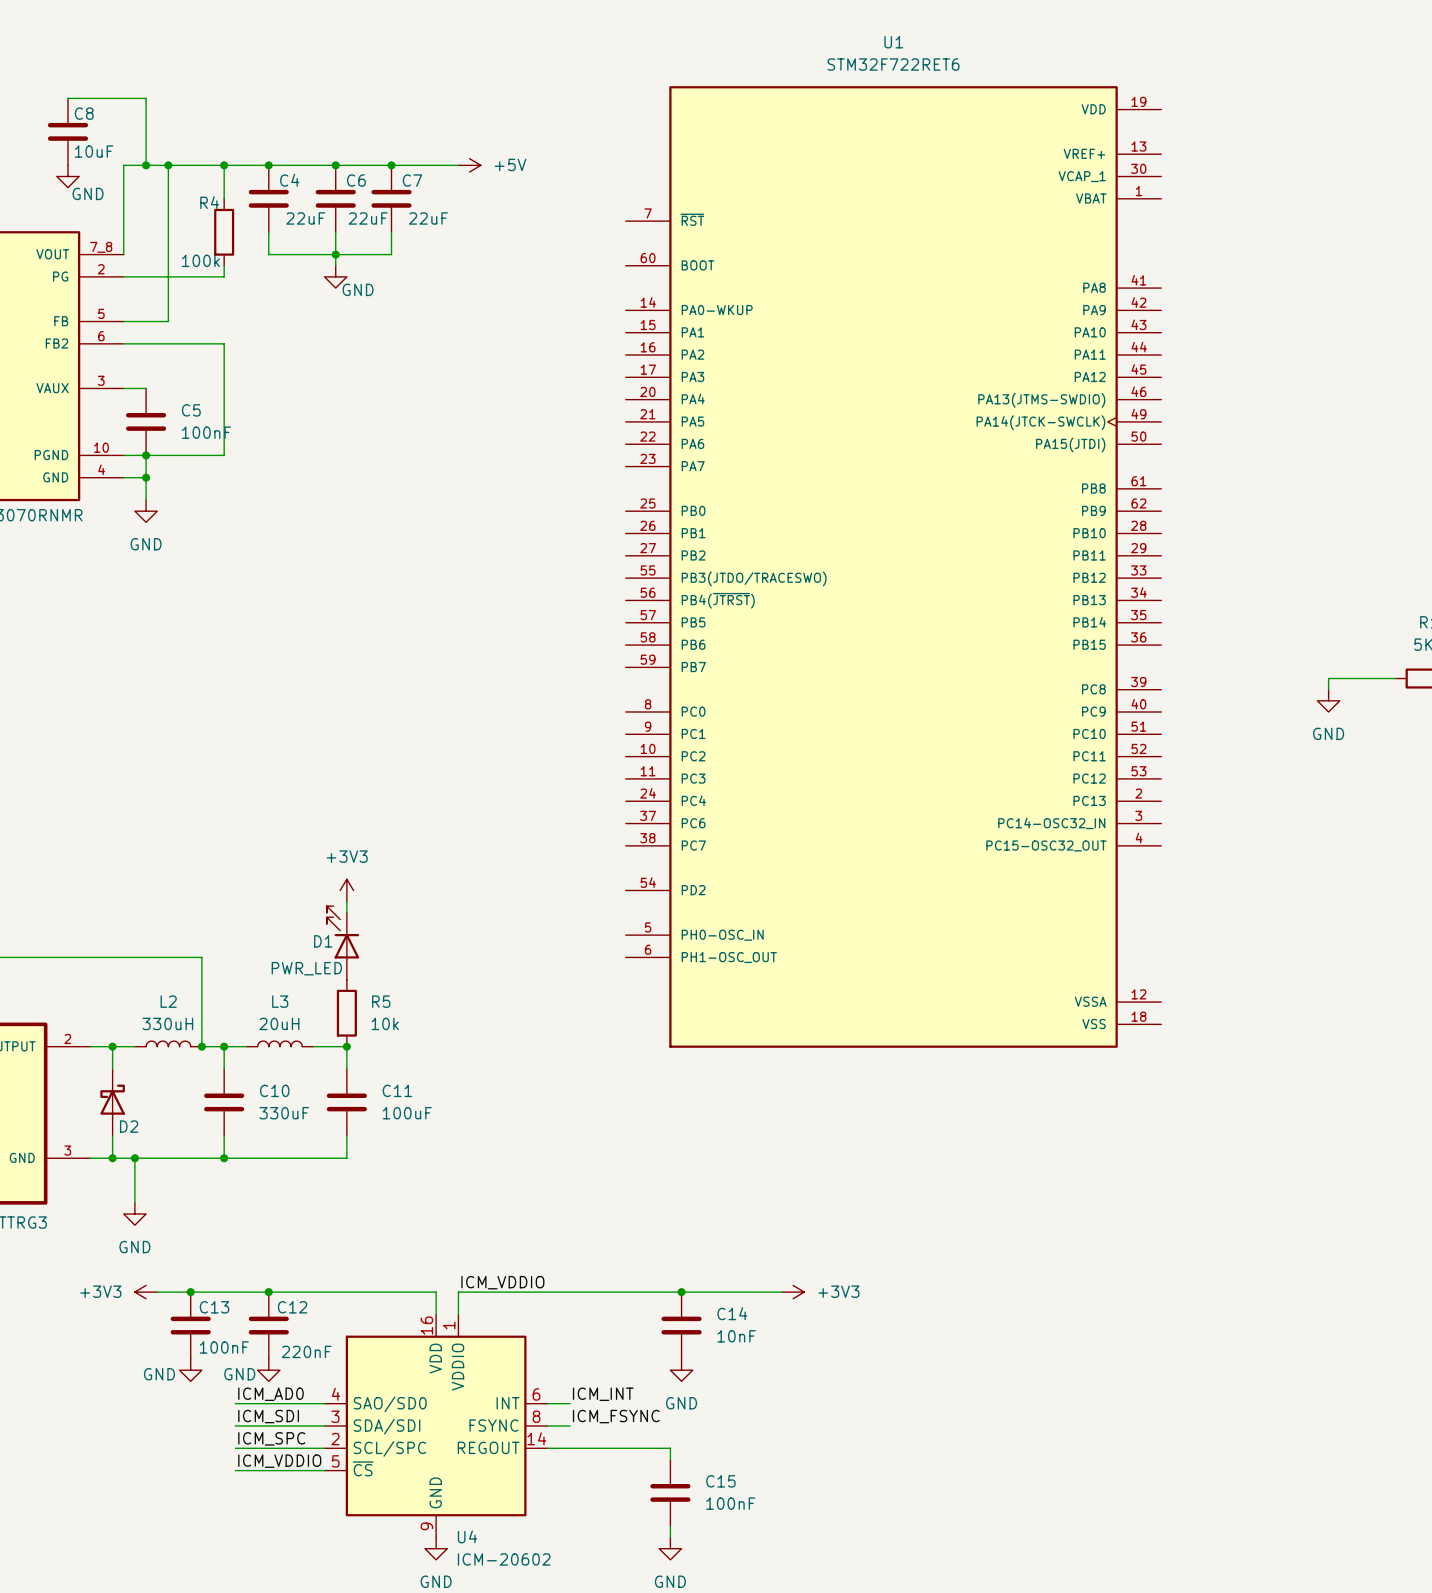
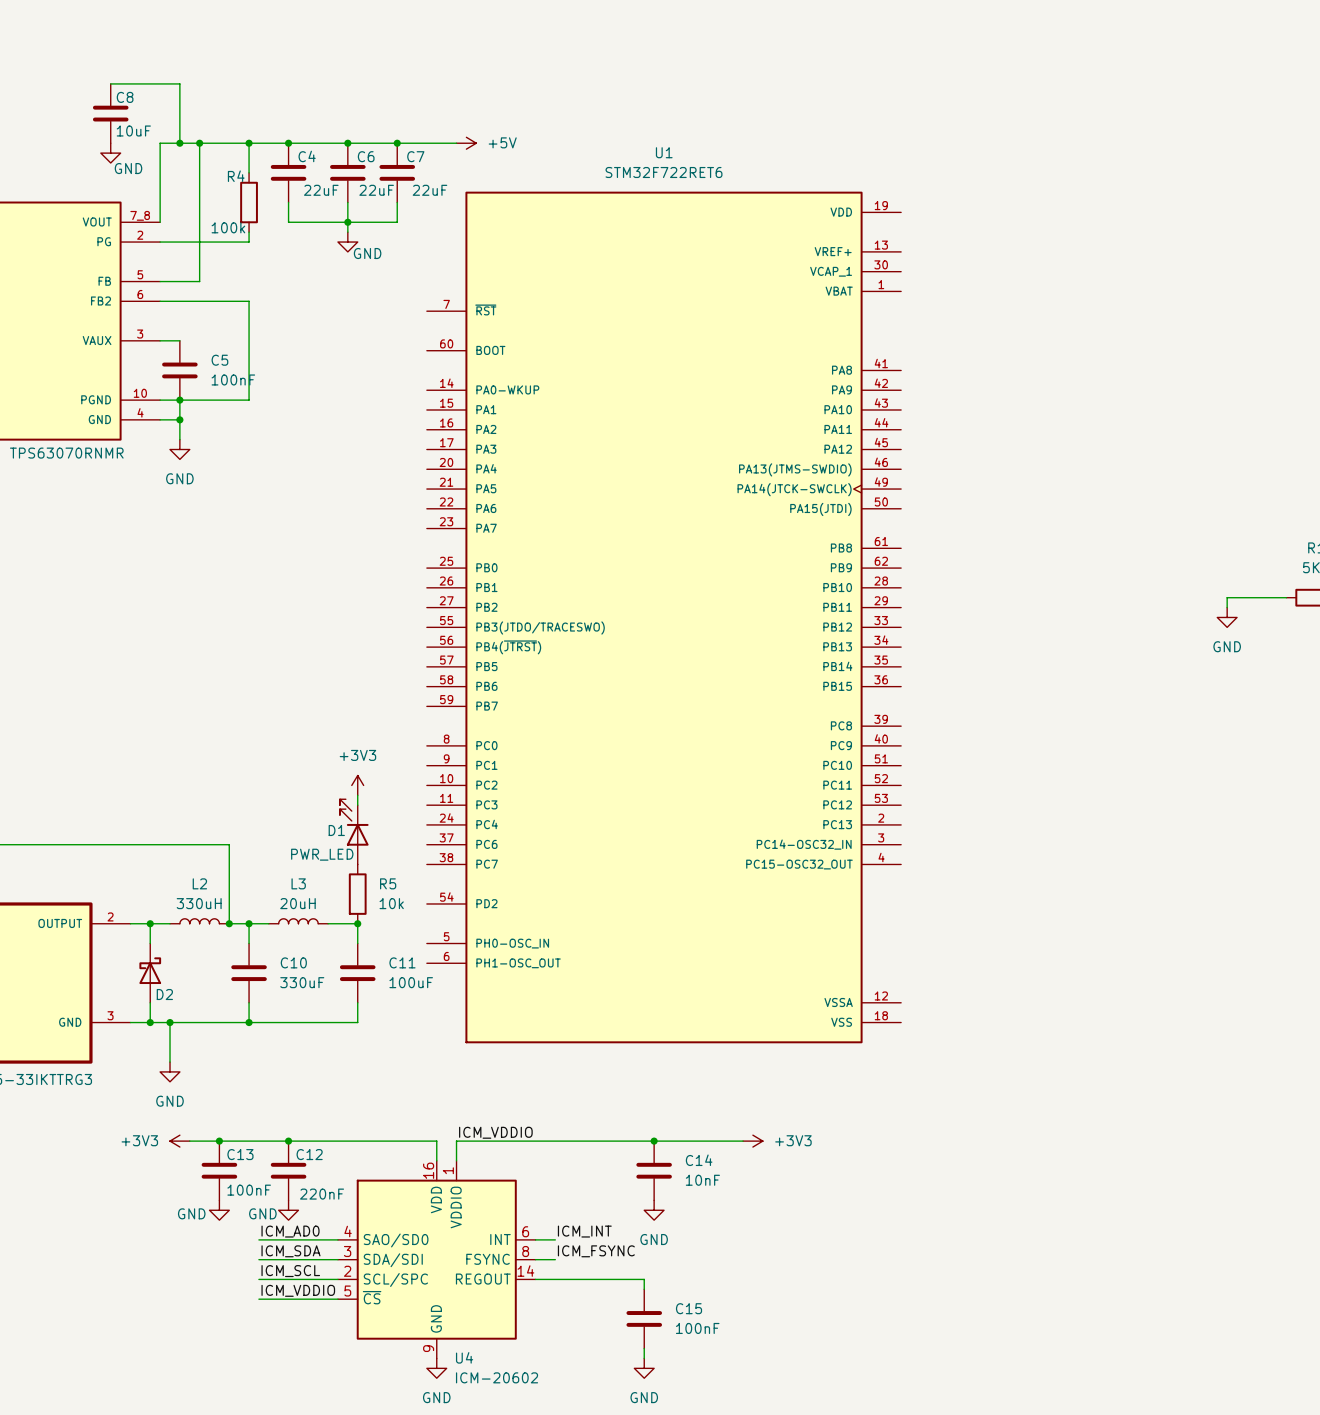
U1 position: (893, 566) -> (664, 617)
label: ICM_SDI (268, 1416) -> ICM_SDA (290, 1251)
label: ICM_SPC (271, 1438) -> ICM_SCL (290, 1271)

